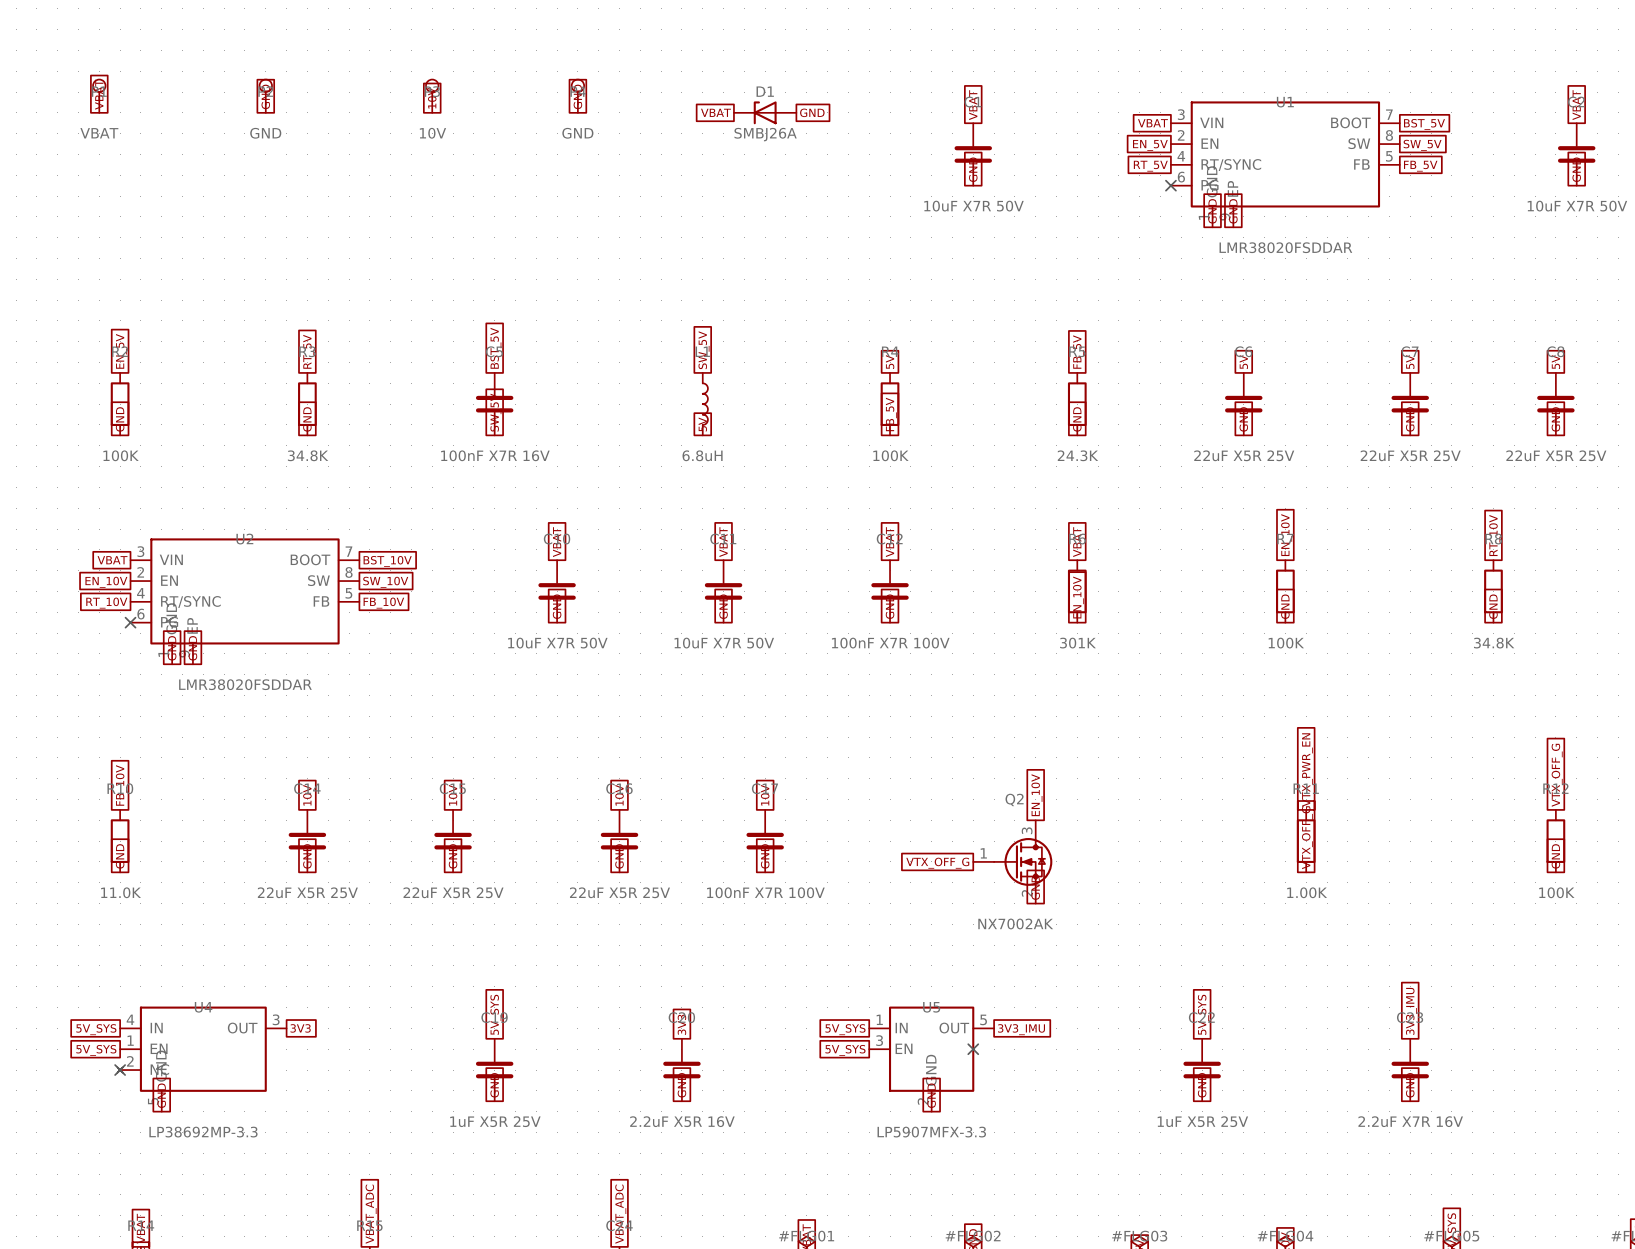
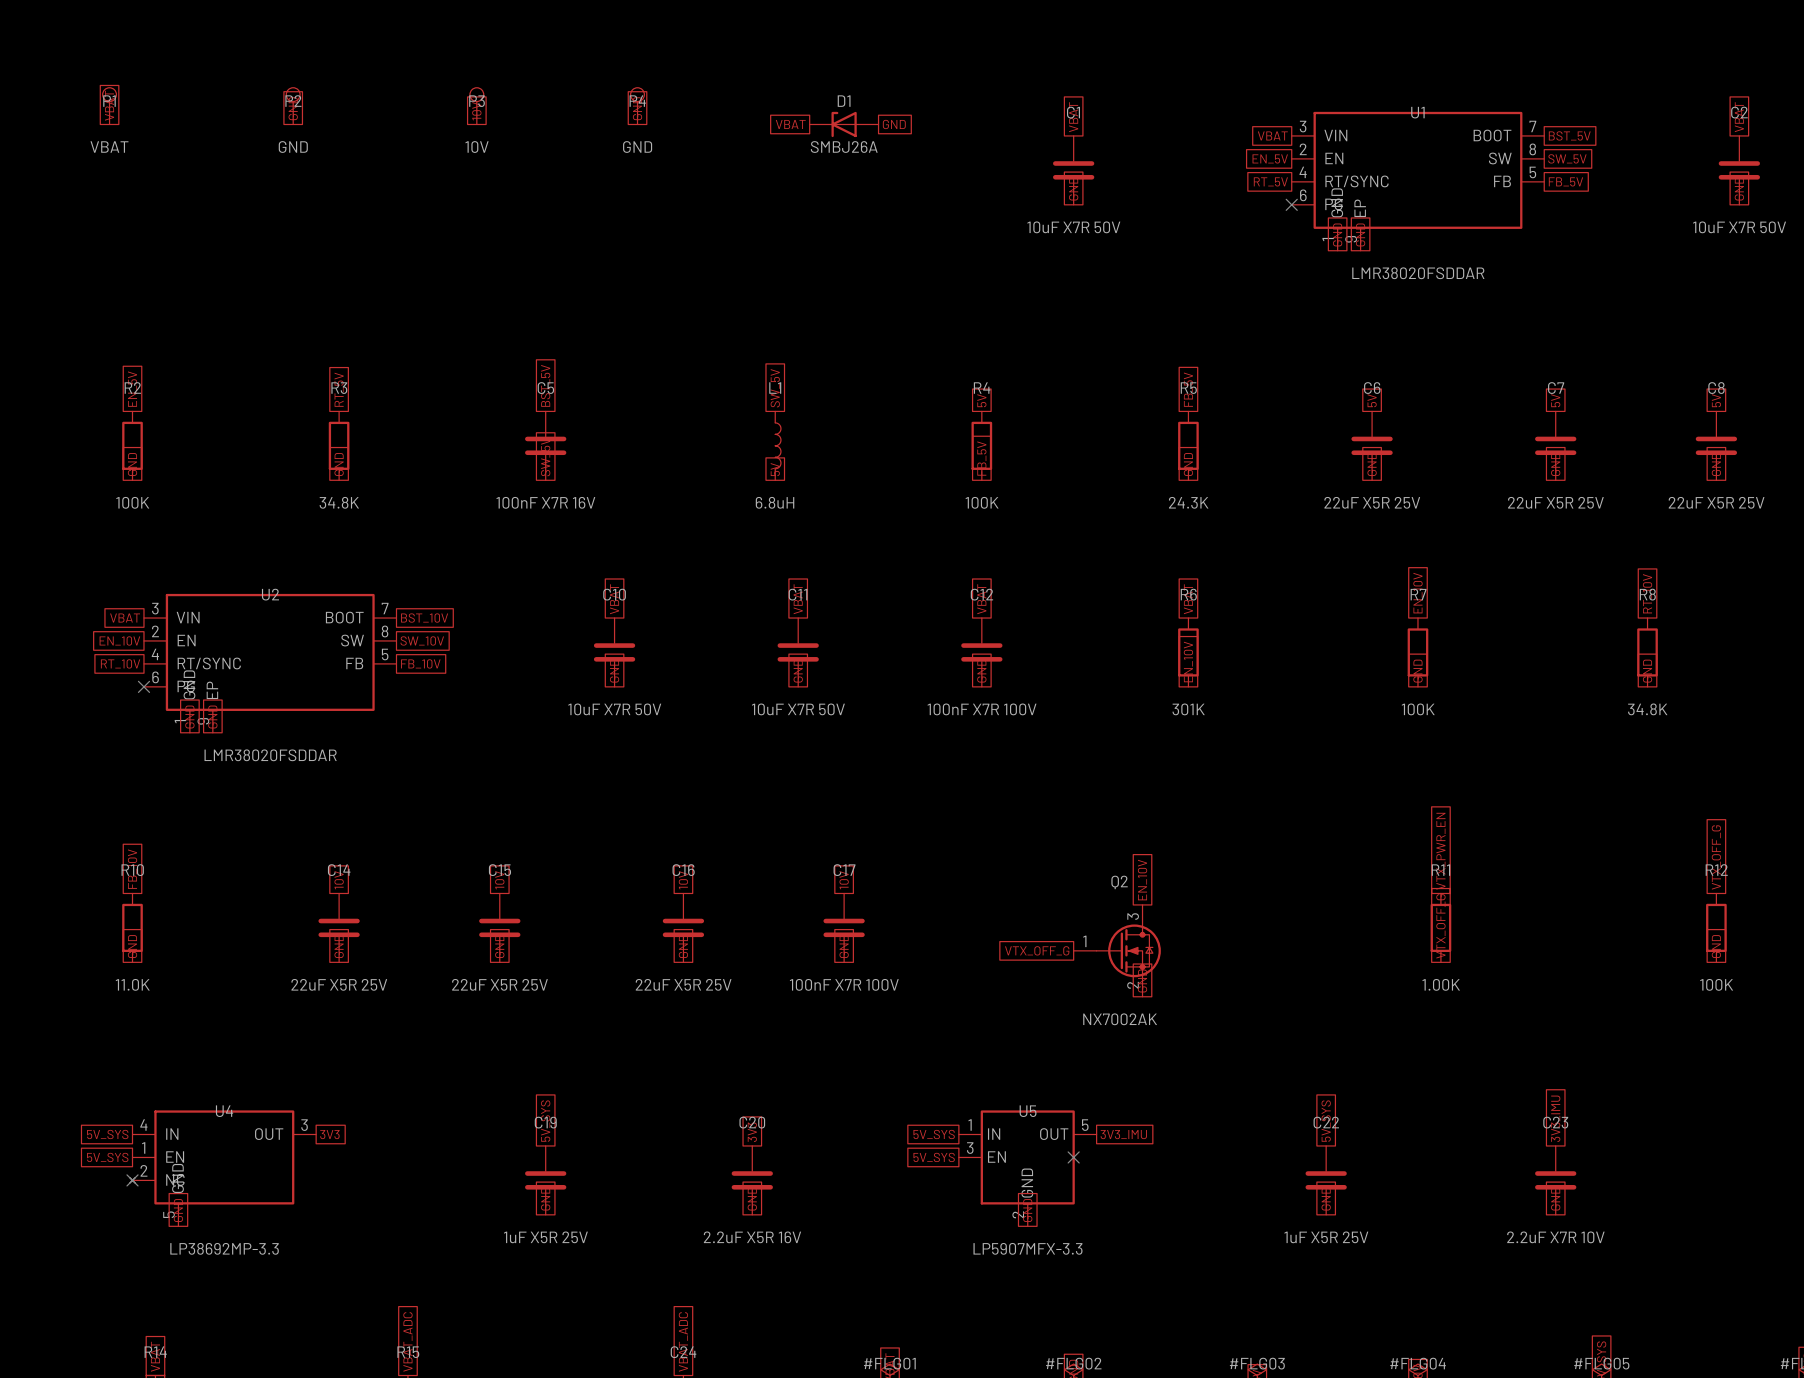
C23 value: 2.2uF X7R 16V (1410, 1121) -> 2.2uF X7R 10V (1555, 1237)

